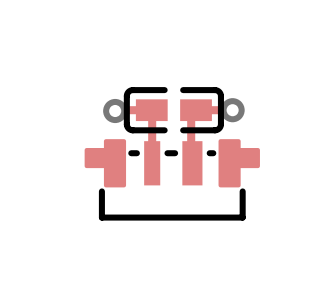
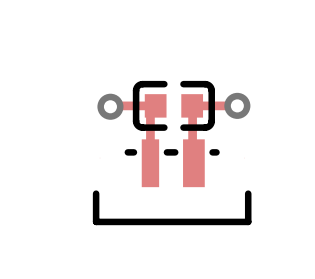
part footprint: [123, 87, 224, 134] -> [132, 80, 215, 131]
part footprint: [84, 139, 260, 221] -> [92, 139, 252, 226]

